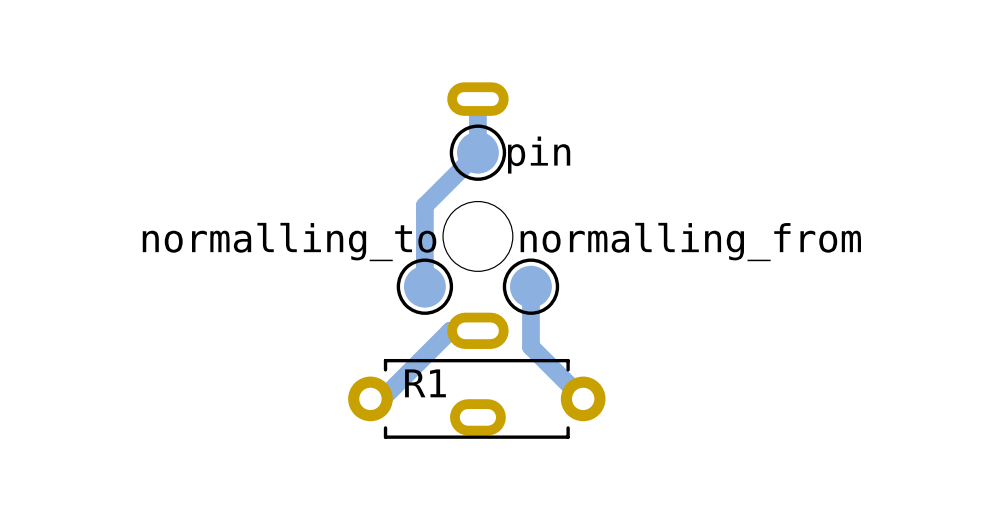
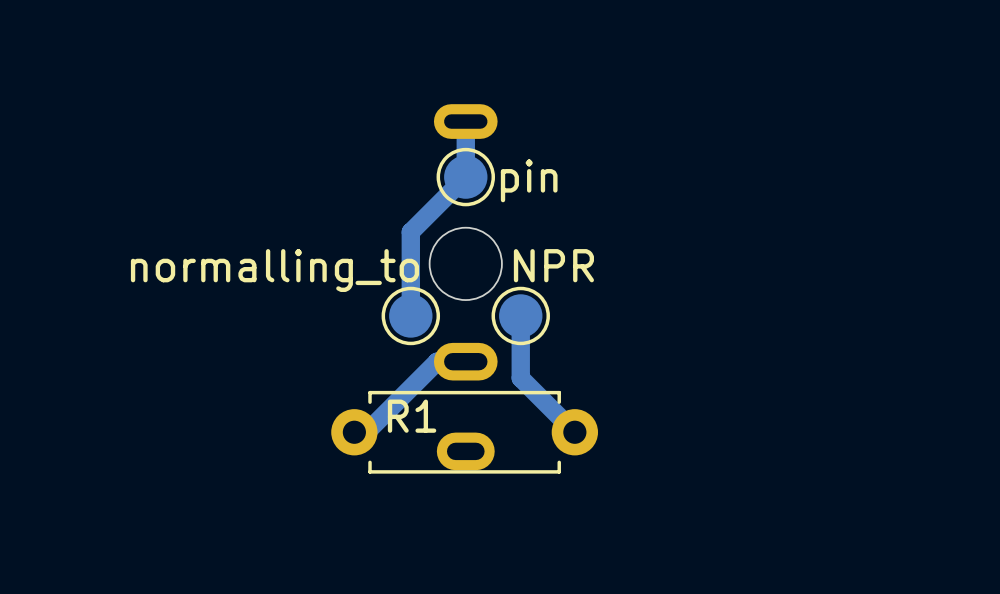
text: normalling_from (690, 242) -> NPR (553, 265)

